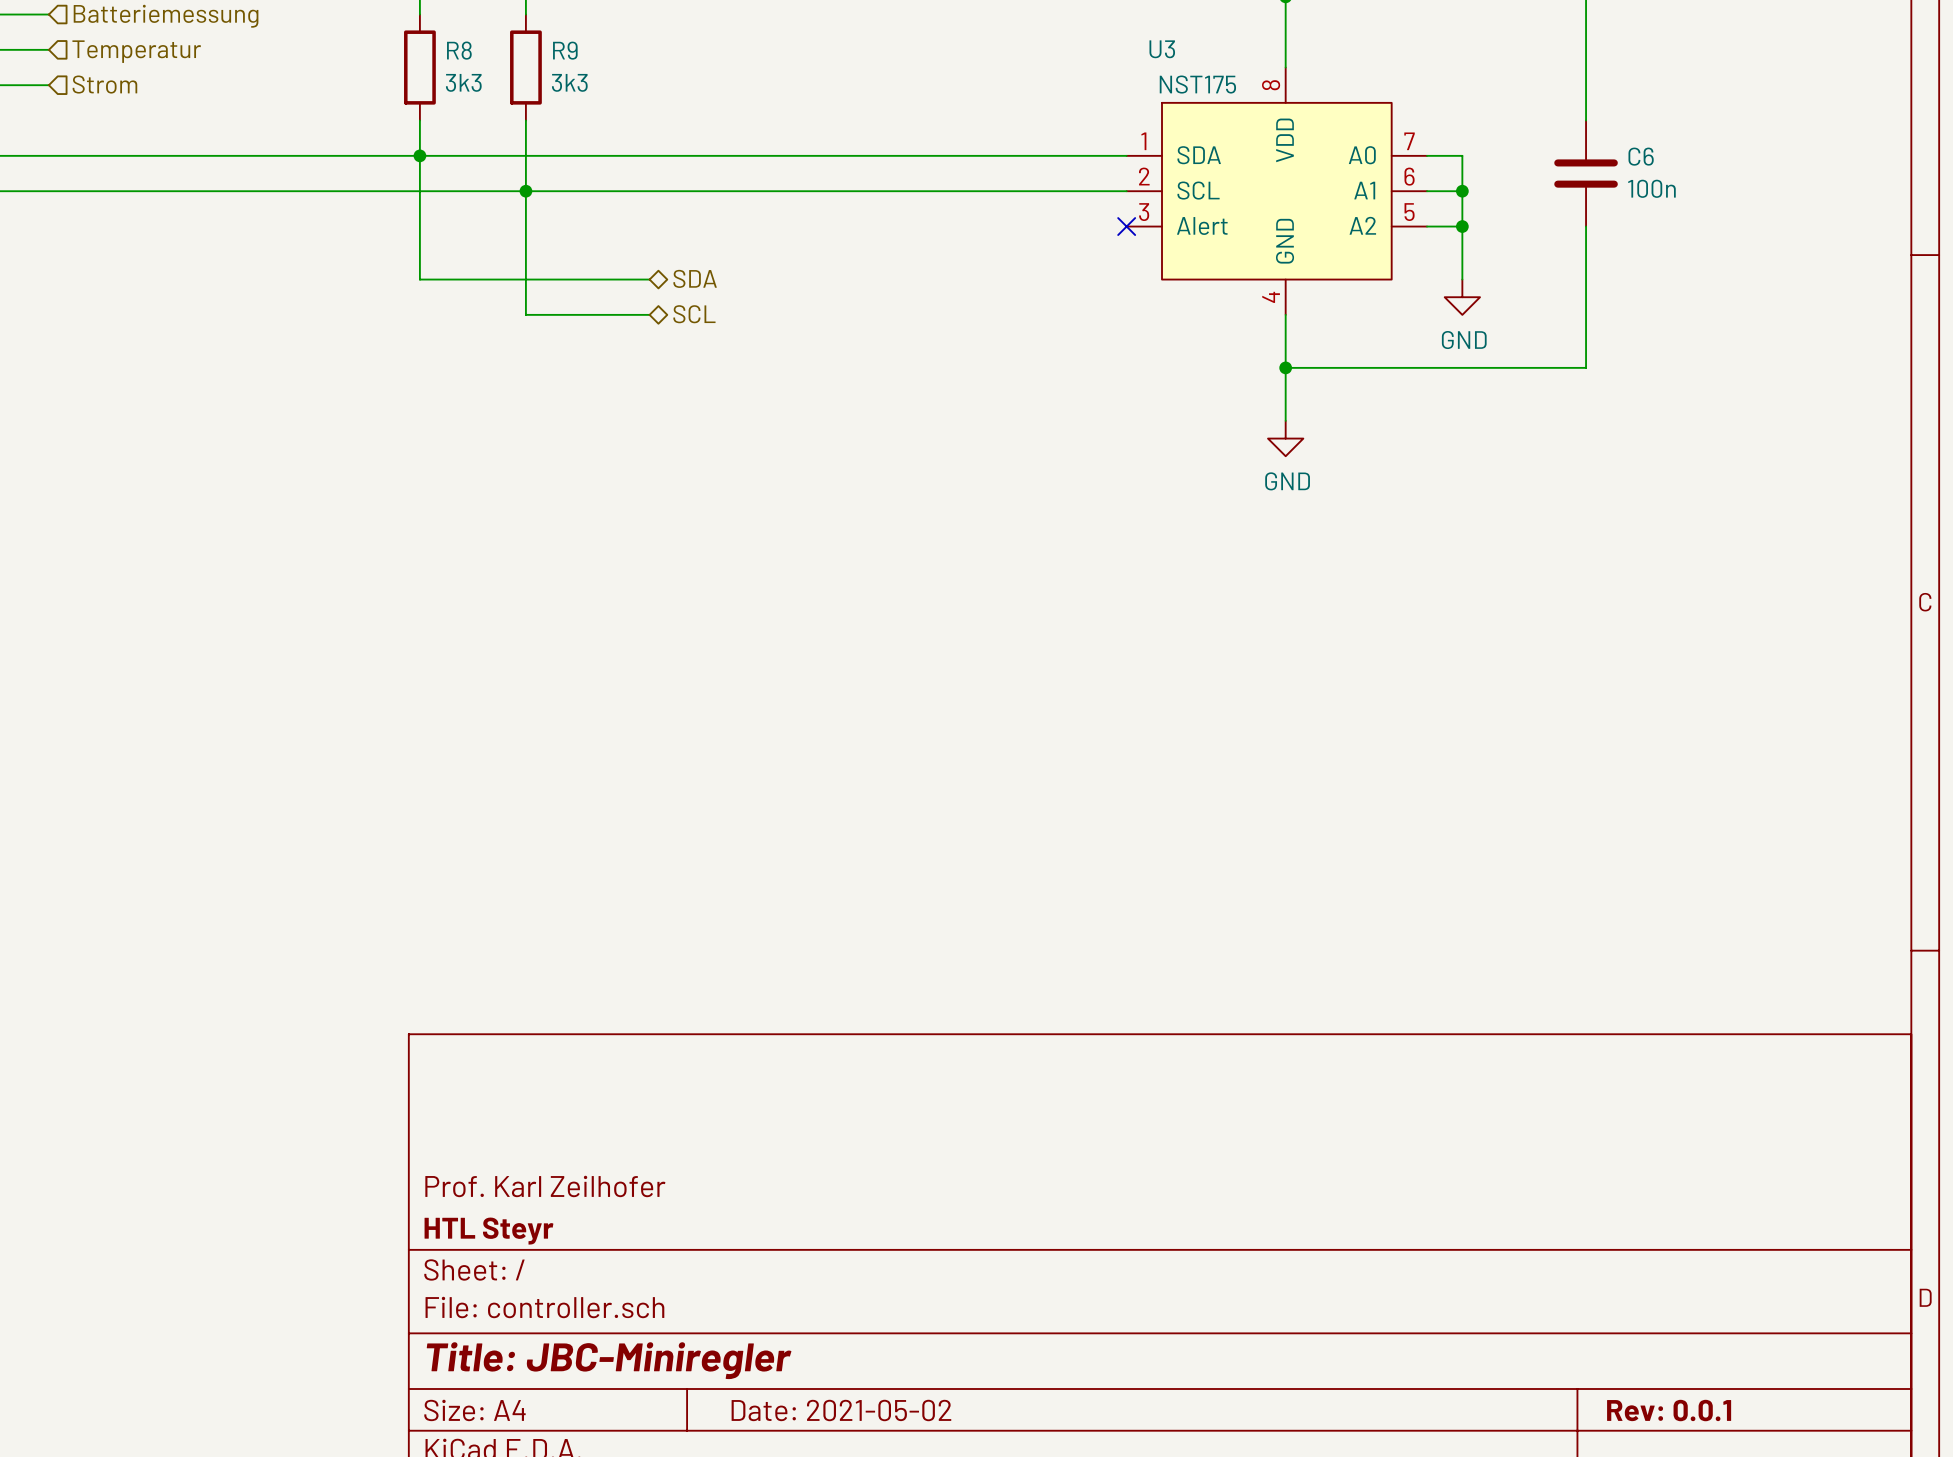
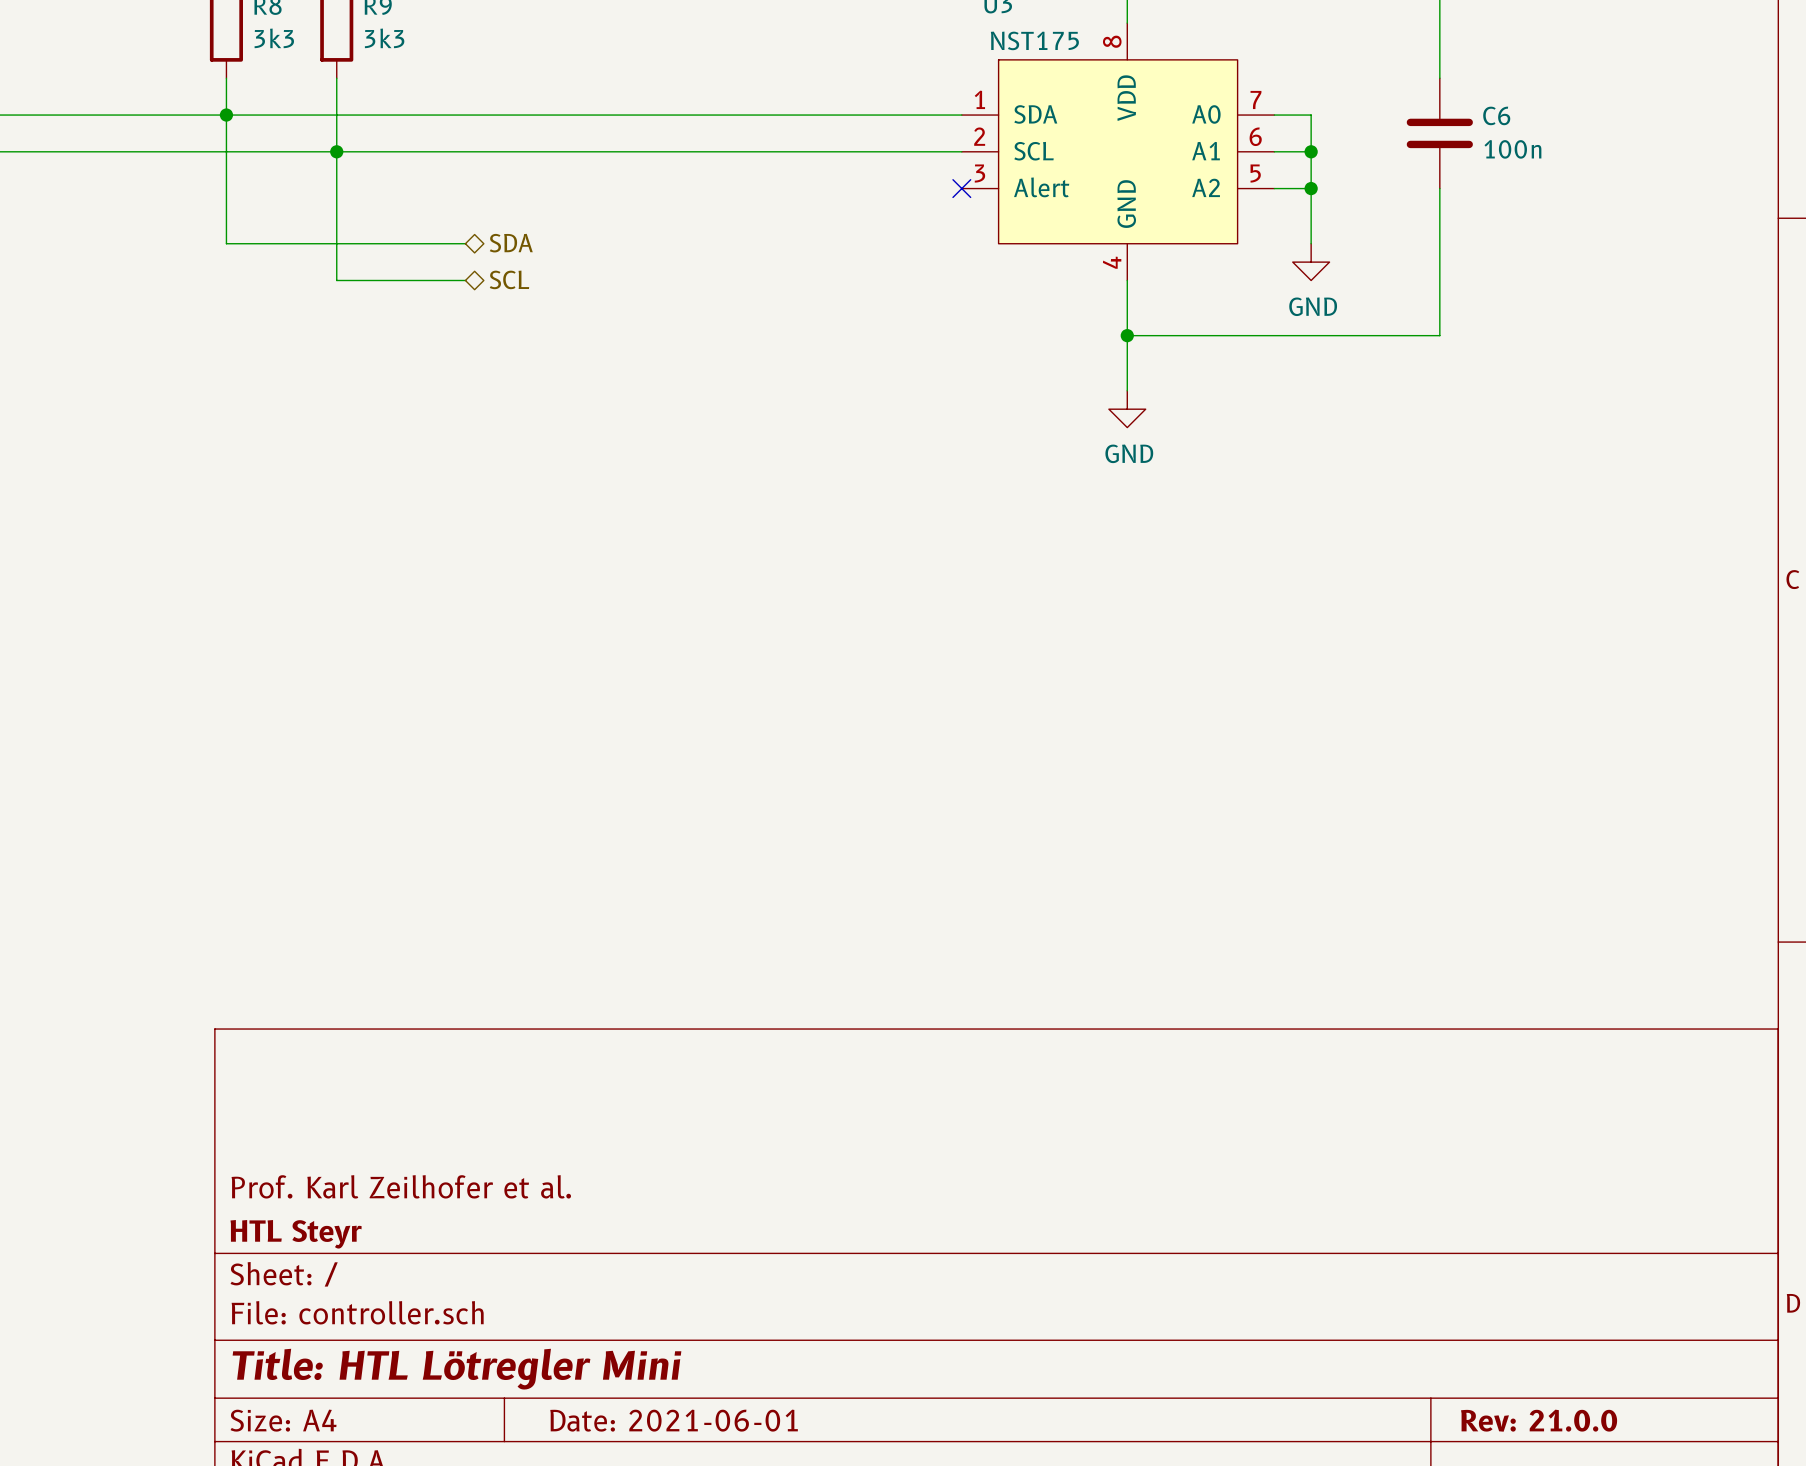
title block: Prof. Karl Zeilhofer (545, 1186) -> Prof. Karl Zeilhofer et al. (401, 1186)
title block: Title: JBC-Miniregler (609, 1360) -> Title: HTL Lötregler Mini (456, 1369)
title block: Date: 2021-05-02 (841, 1410) -> Date: 2021-06-01 (674, 1420)
title block: Rev: 0.0.1 (1669, 1410) -> Rev: 21.0.0 (1539, 1420)

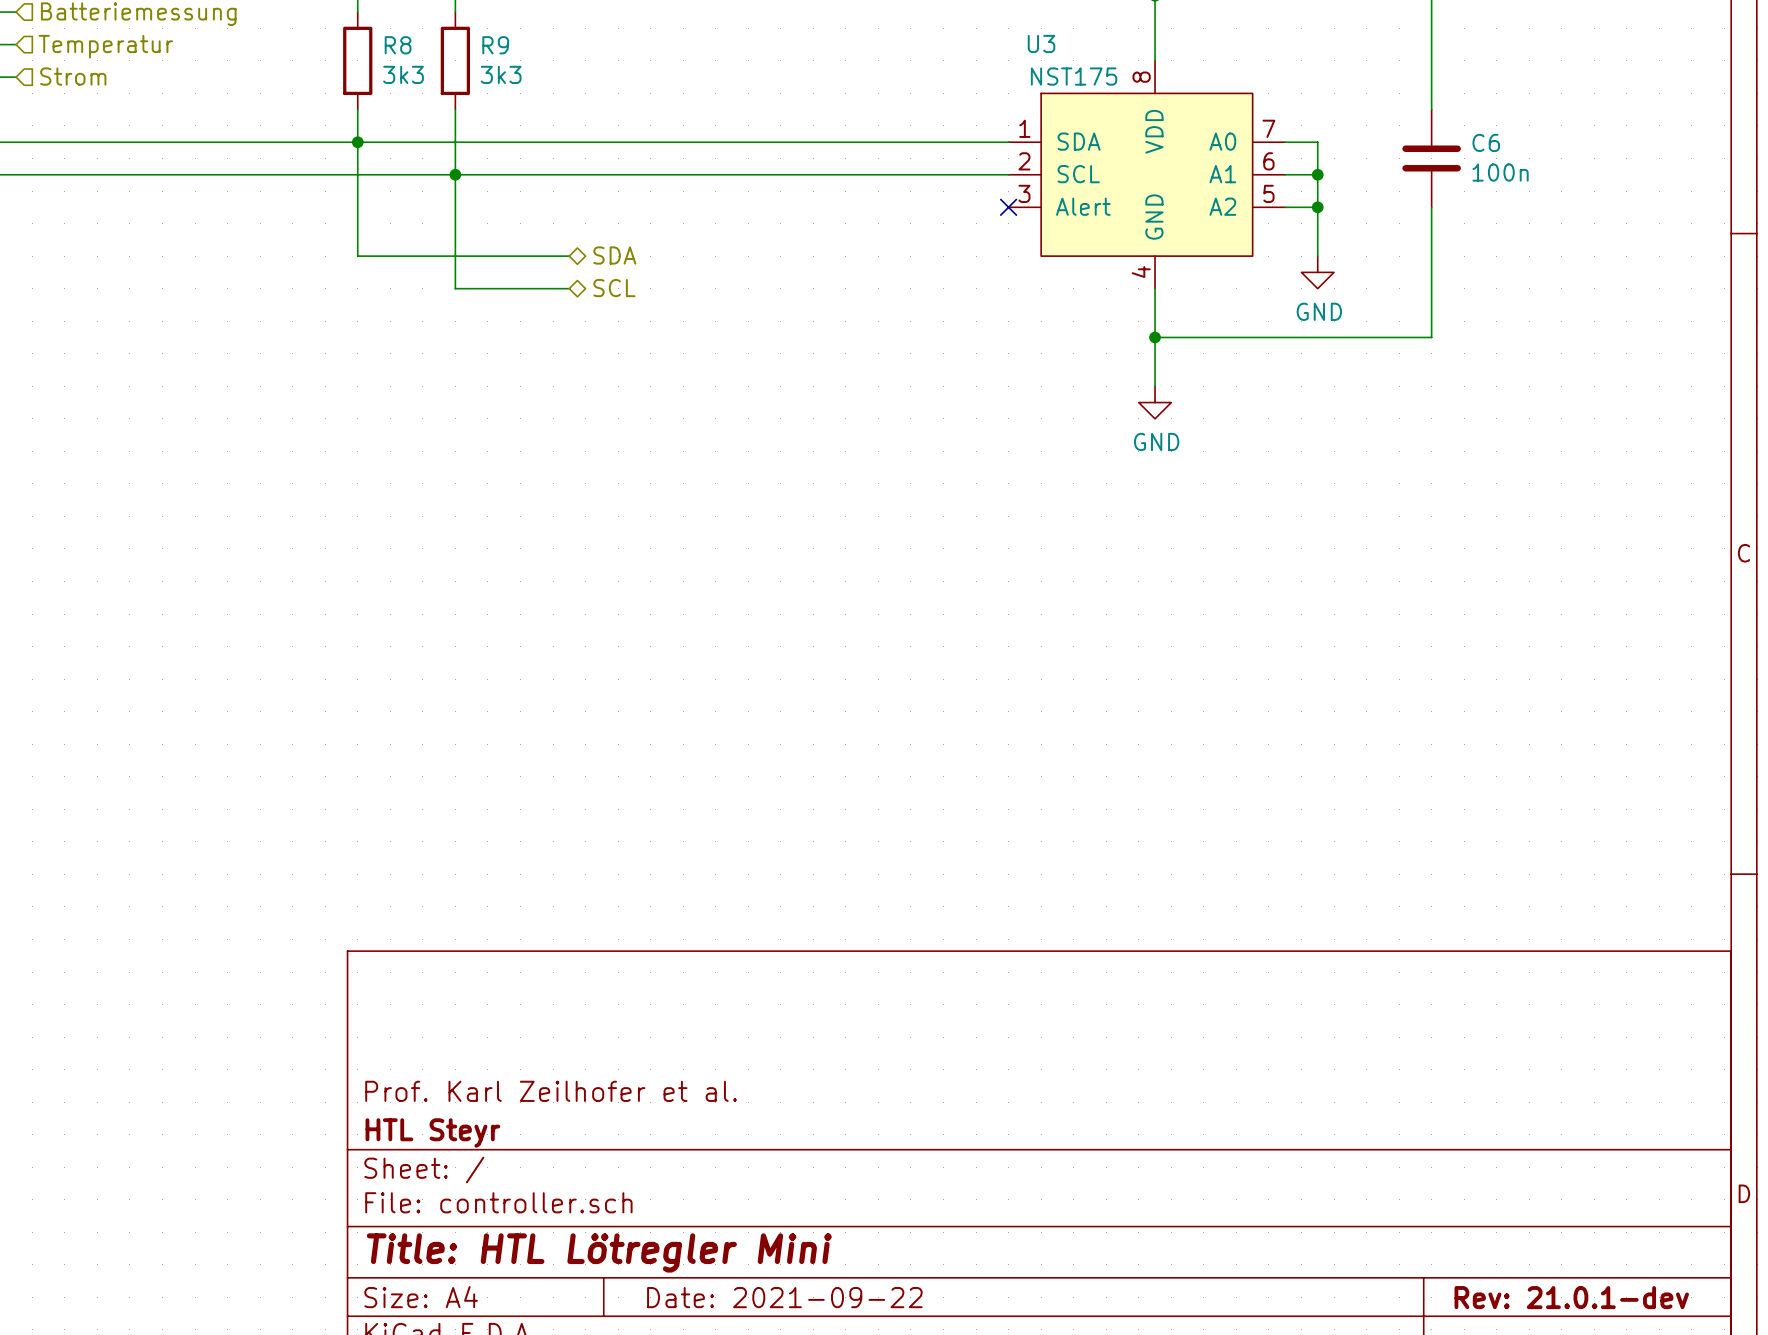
title block: Date: 2021-06-01 (674, 1420) -> Date: 2021-09-22 (784, 1297)
title block: Rev: 21.0.0 (1539, 1420) -> Rev: 21.0.1-dev (1571, 1297)

